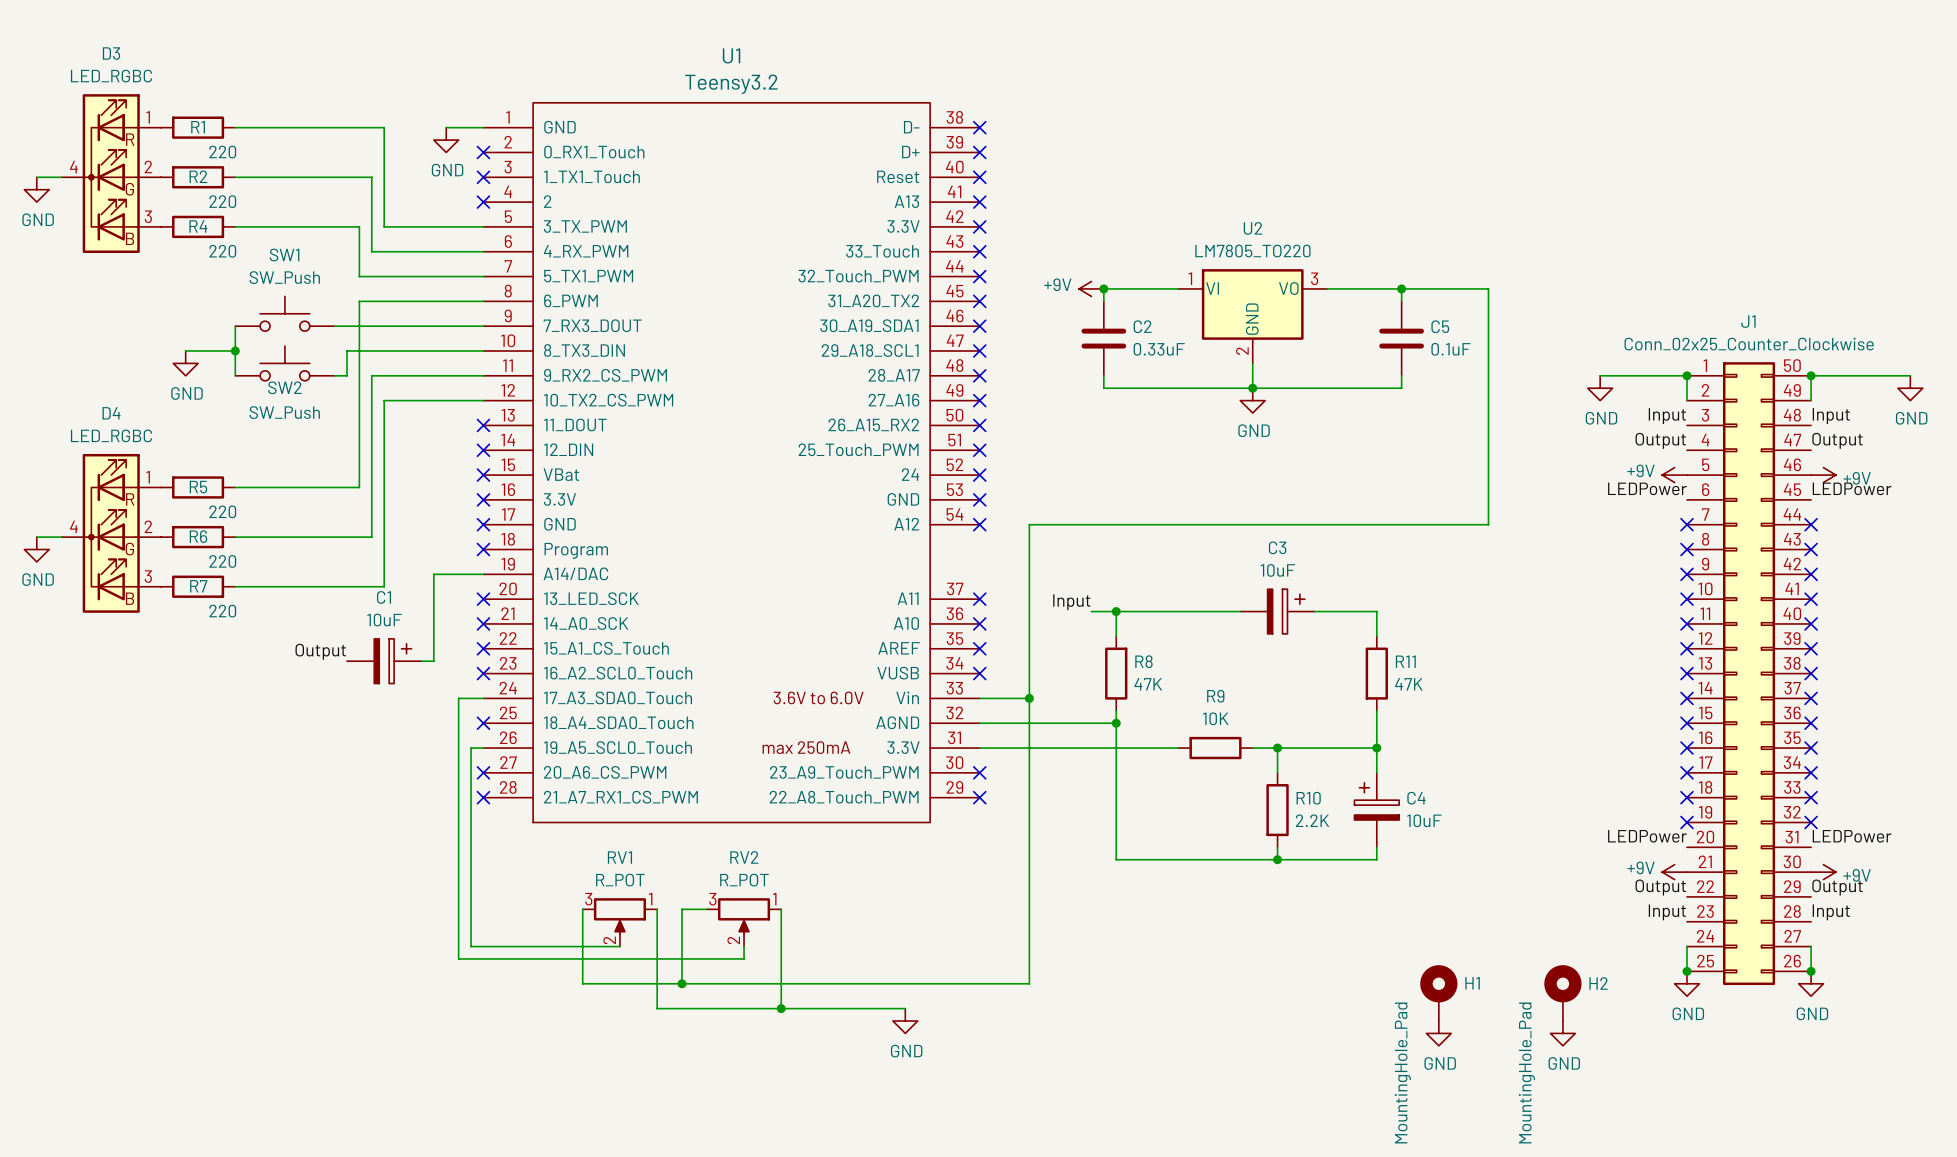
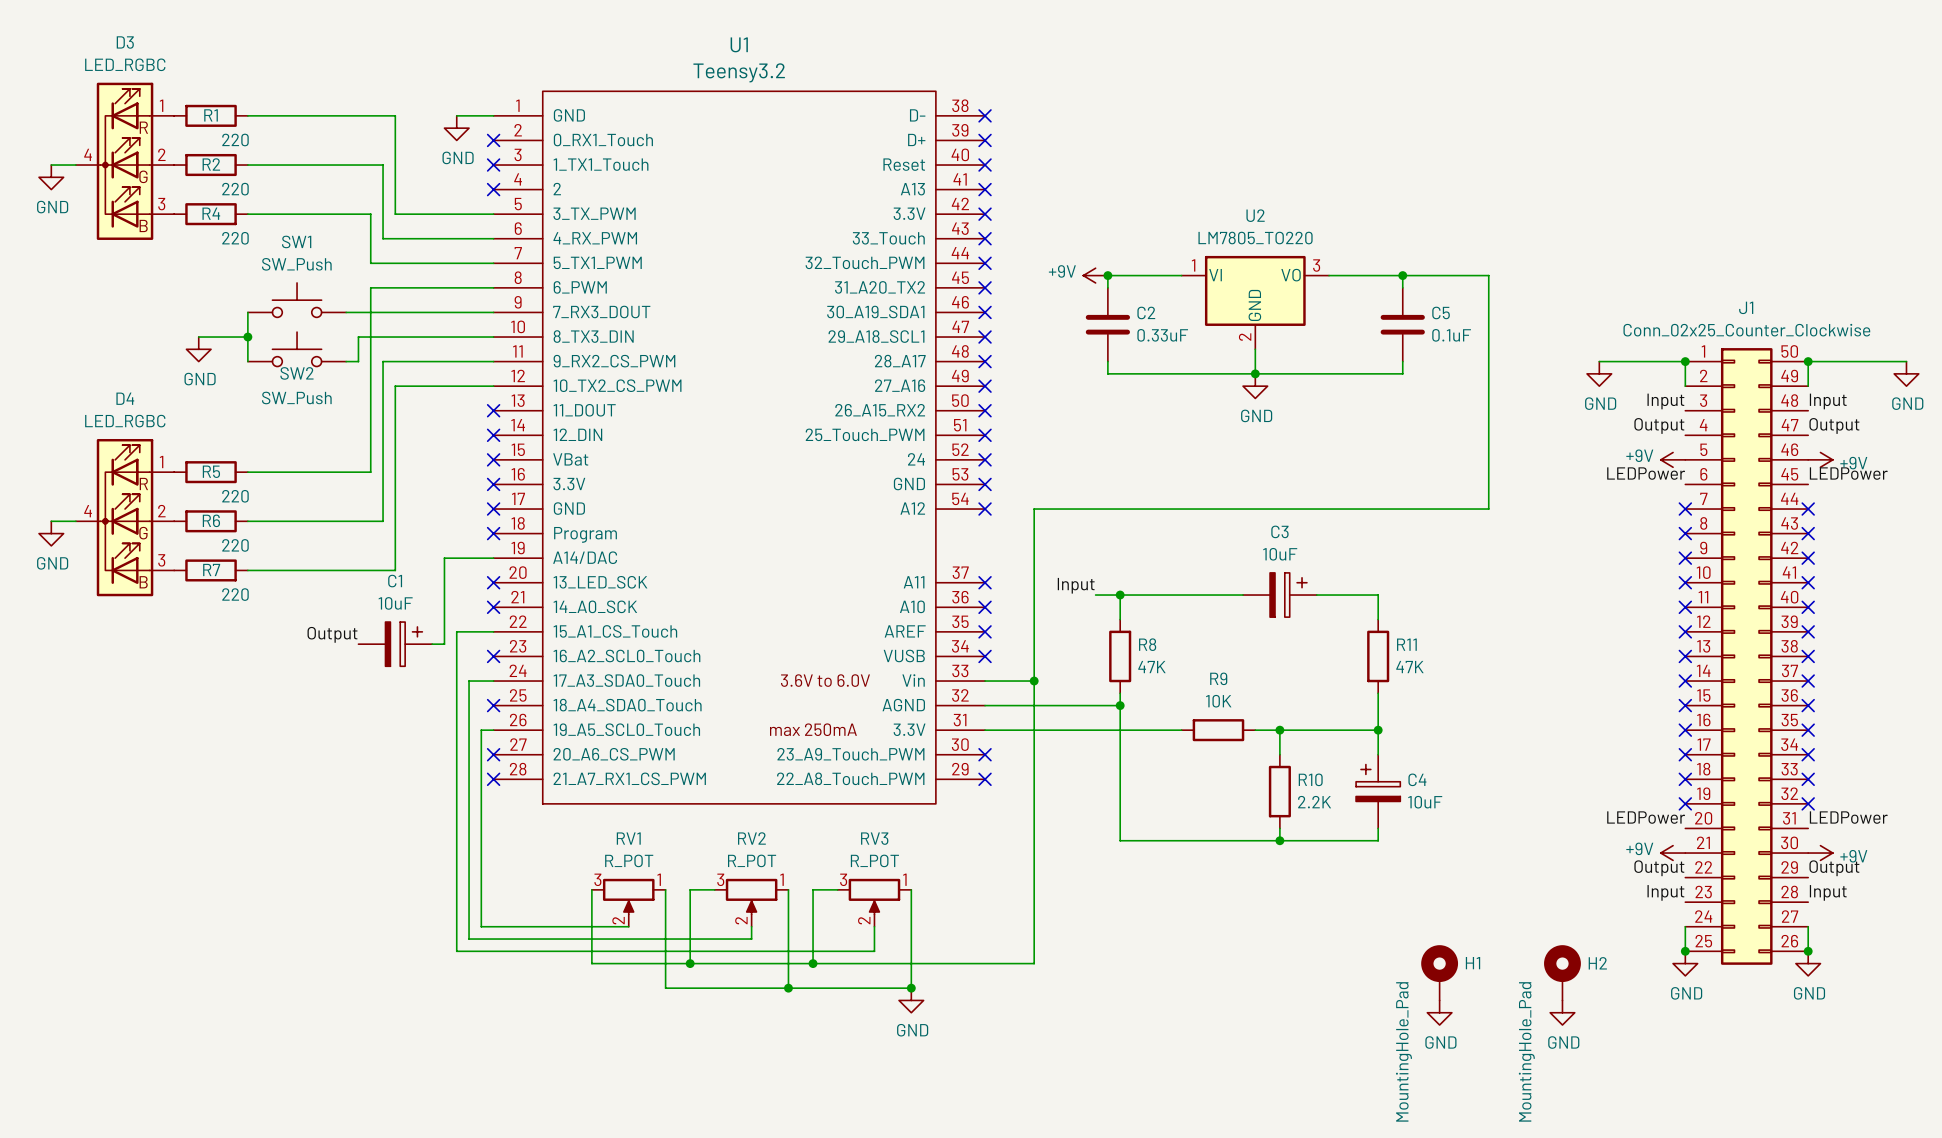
wire: none -> (493, 631) (456, 631) (456, 951) (874, 951) (874, 926)
no-connect mark: (483, 648) -> none
wire: none -> (837, 889) (813, 889) (813, 963)
wire: none -> (911, 889) (911, 988)
RV3: none -> R_POT (874, 902)
junction: none -> (813, 963)
junction: none -> (911, 988)

